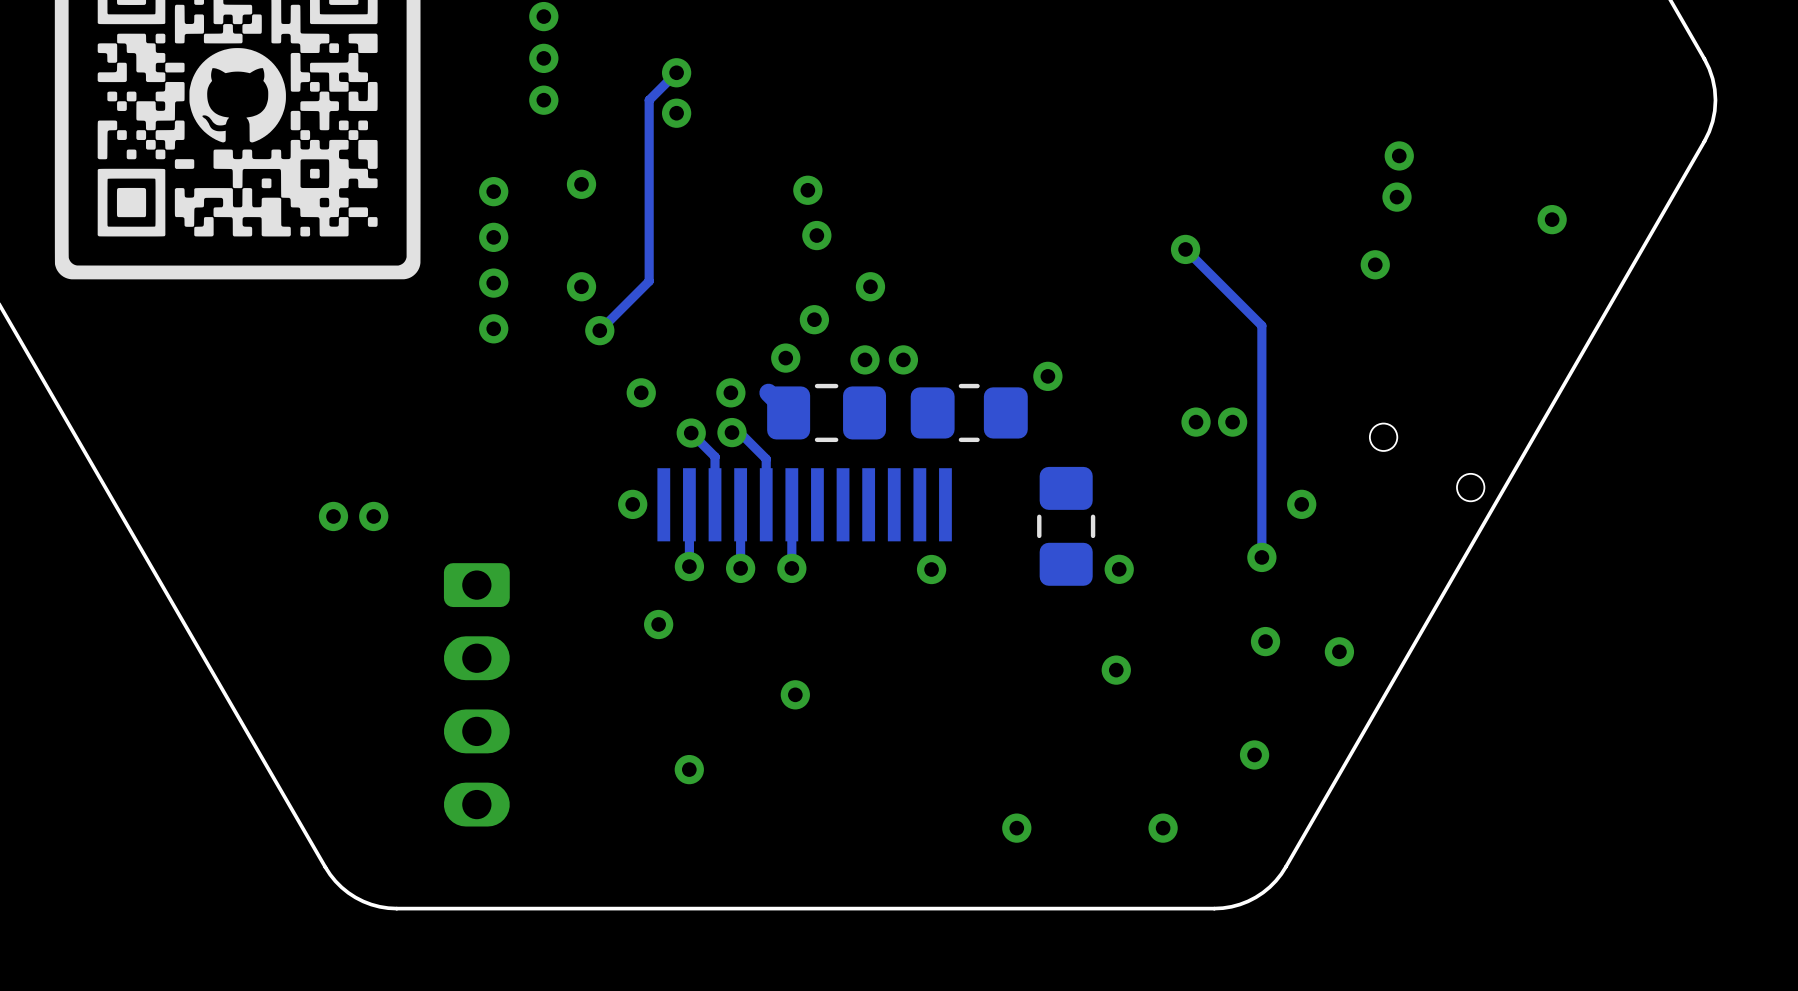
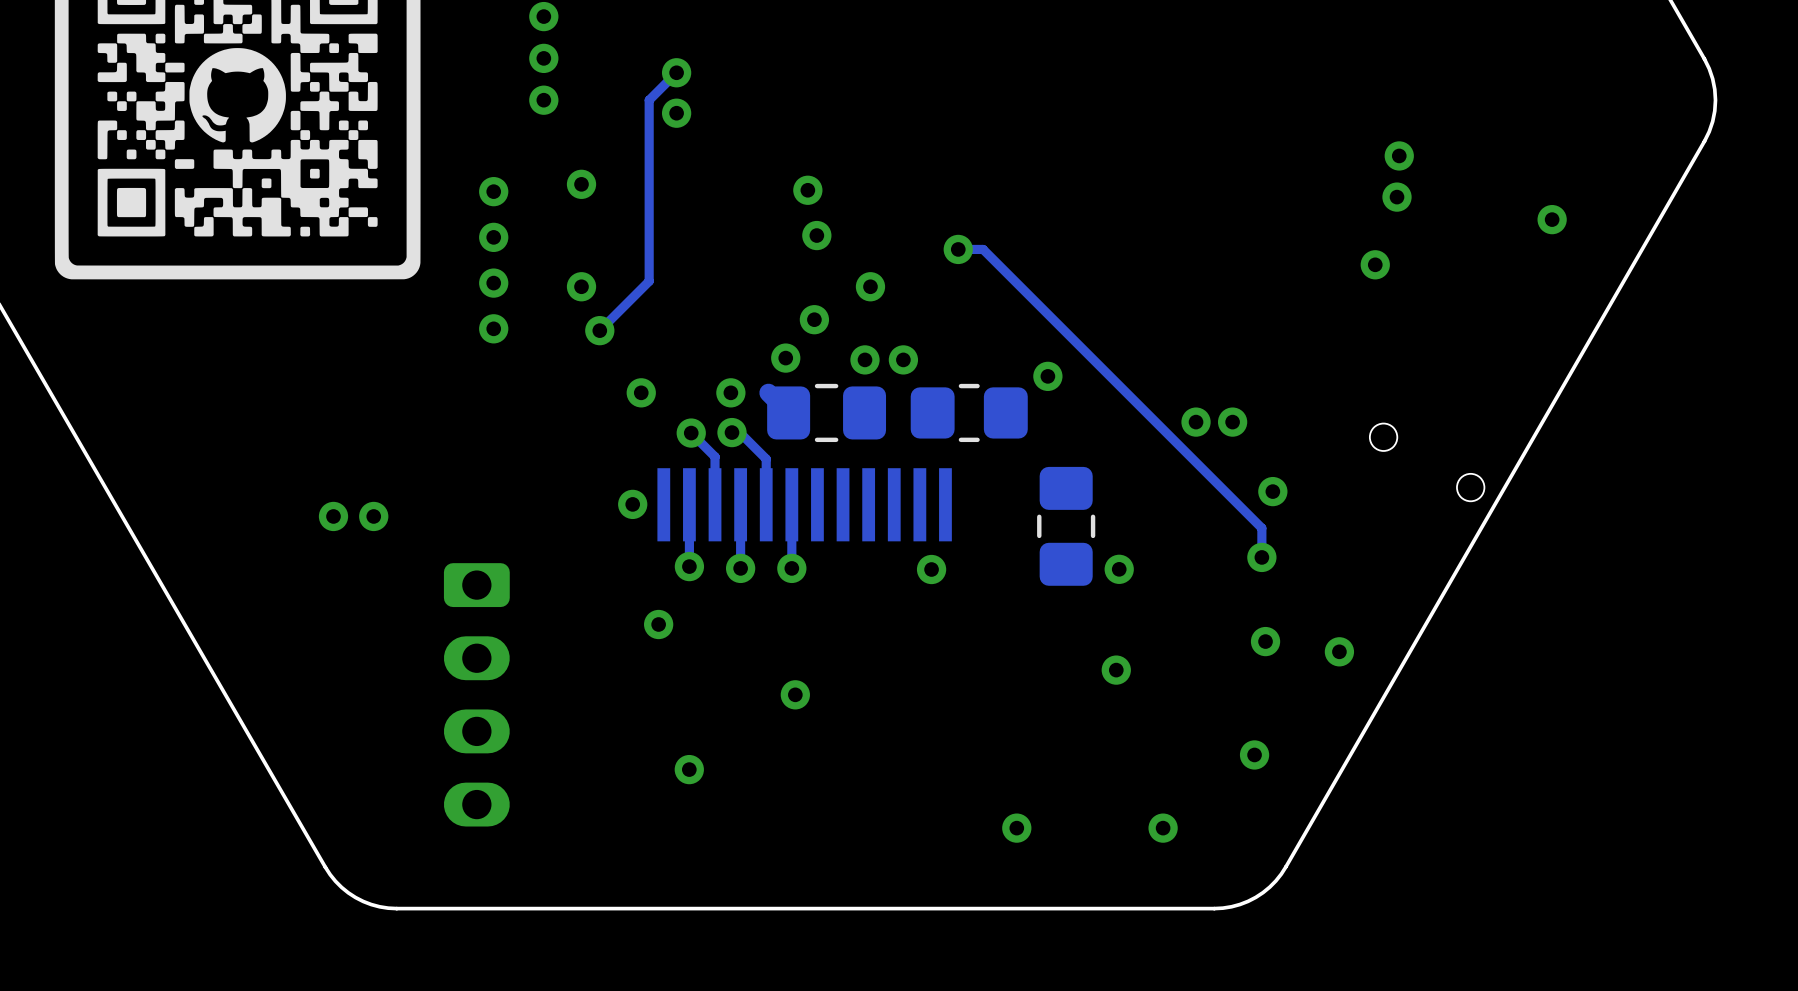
via: none -> (958, 249)
track: (1185, 249) (1261, 325) (1261, 528) -> (958, 249) (983, 249) (1261, 528)
via: (1185, 249) -> none
via position: (1301, 504) -> (1272, 491)

